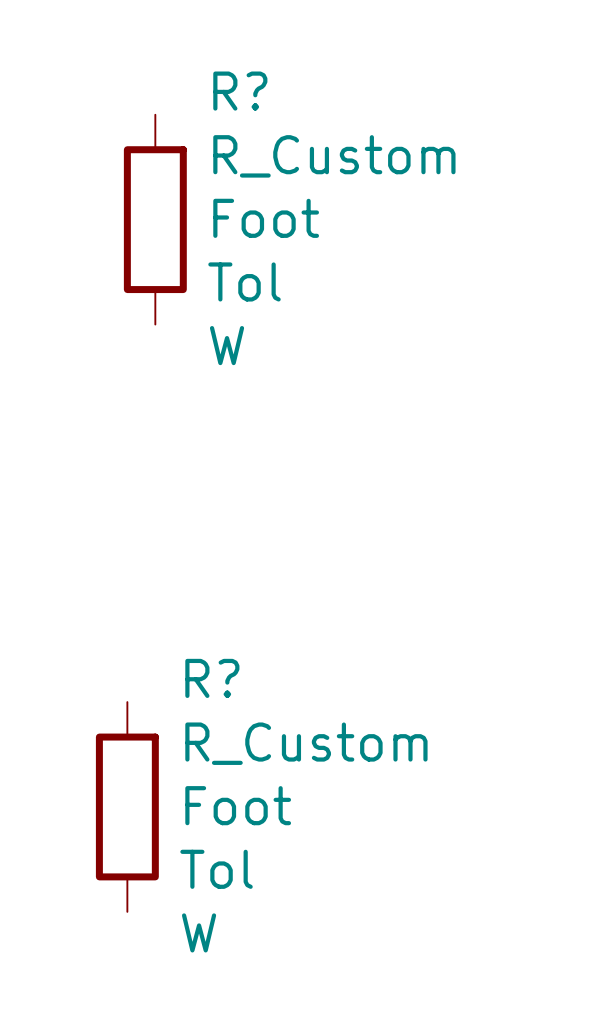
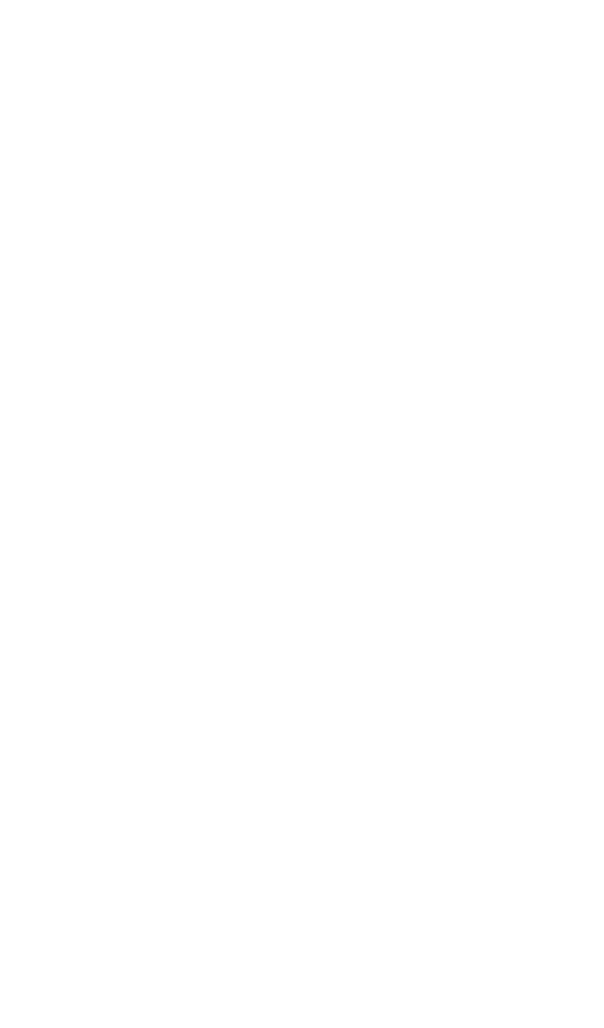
R?: R_Custom (155, 219) -> none
R?: R_Custom (127, 806) -> none

